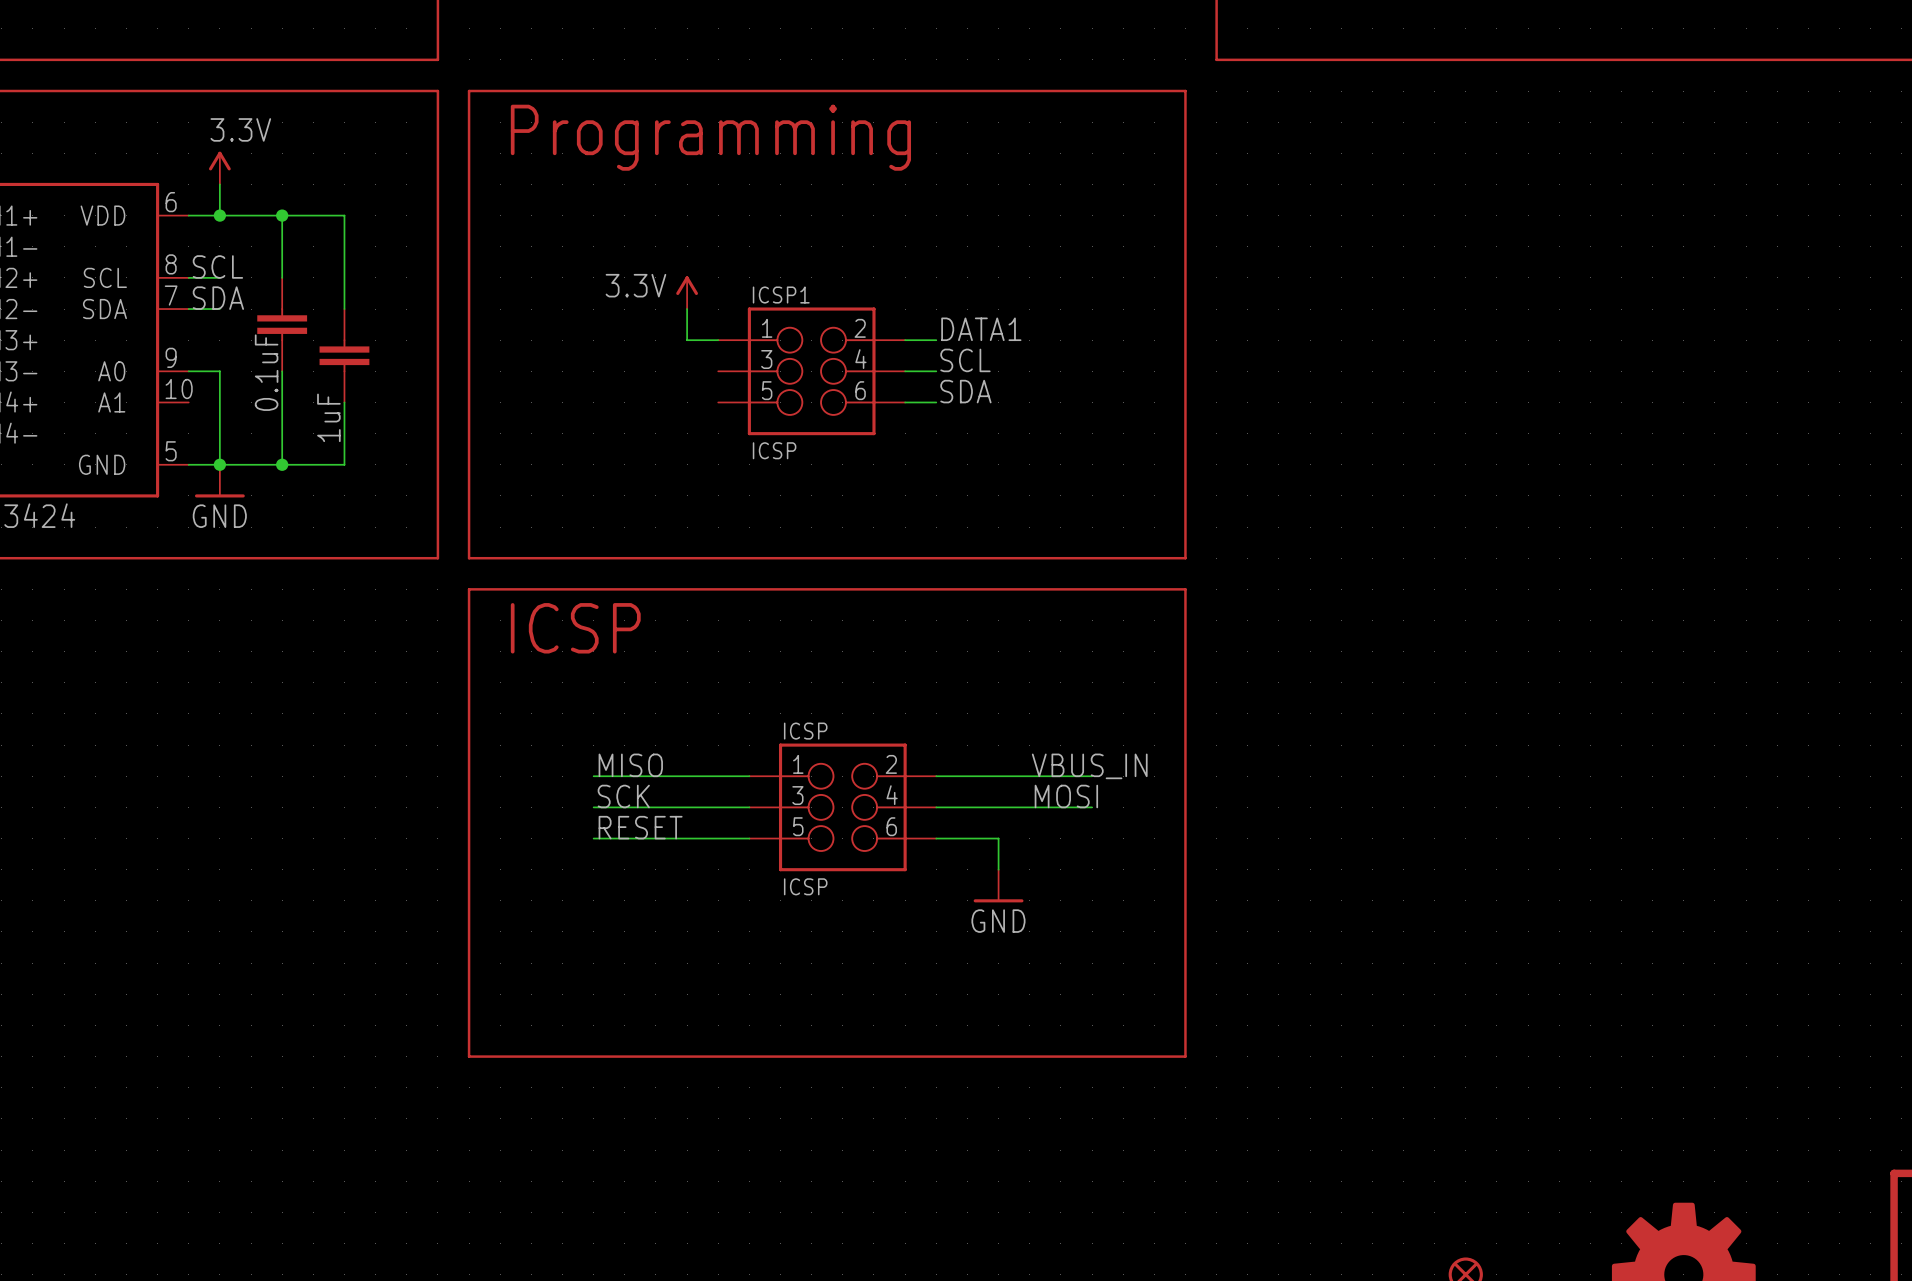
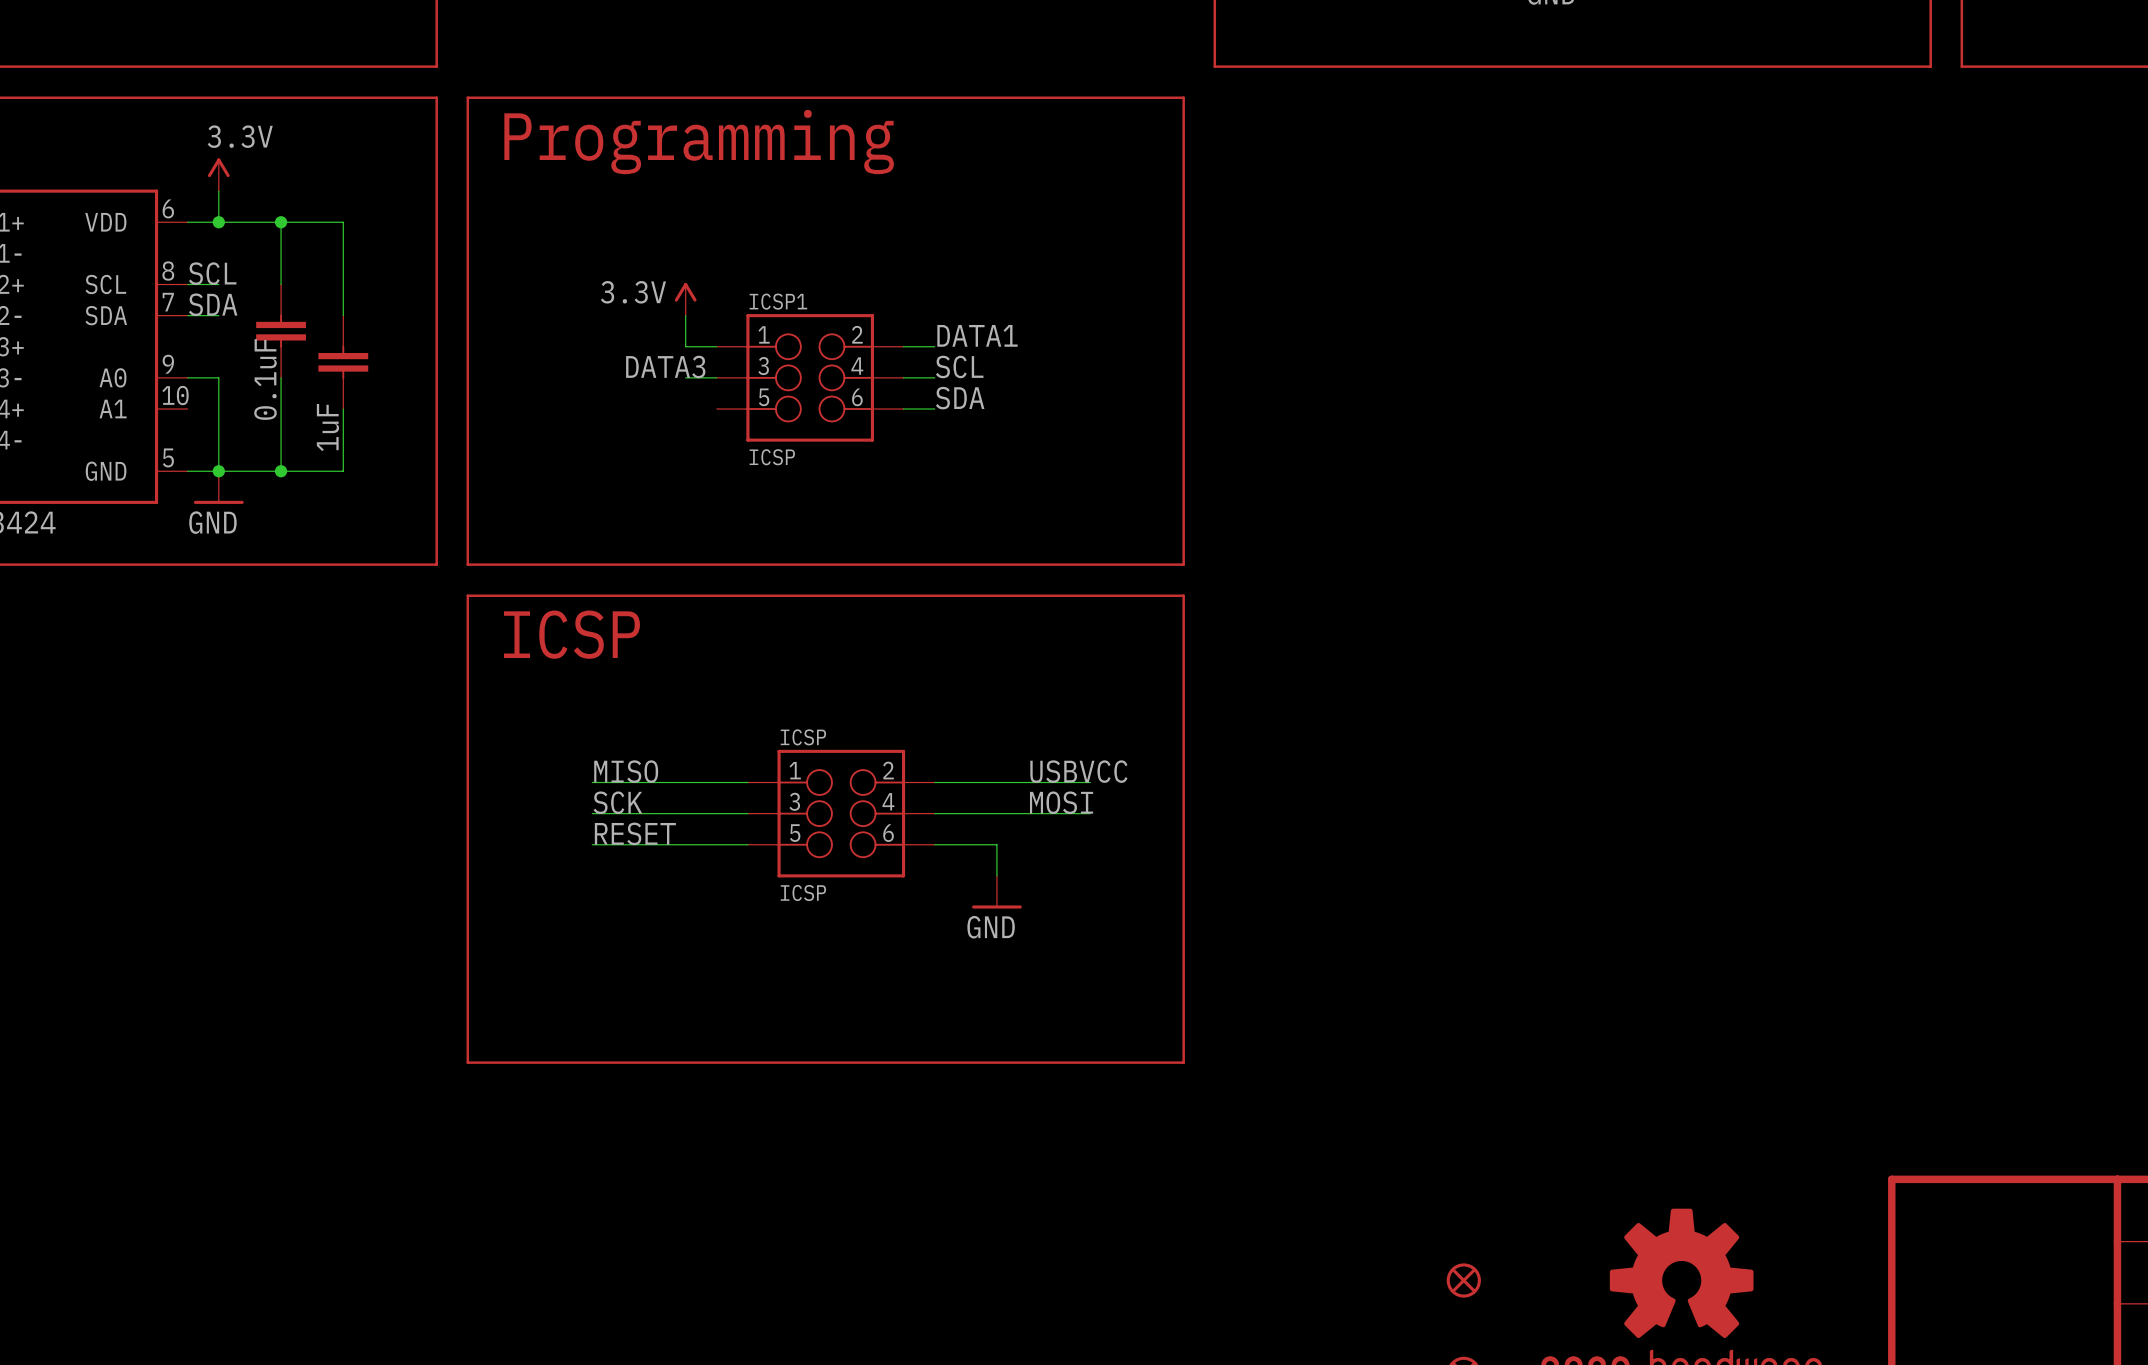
label: none -> DATA3 (665, 366)
wire: none -> (685, 377) (716, 377)
label: VBUS_IN (1089, 766) -> USBVCC (1078, 771)

